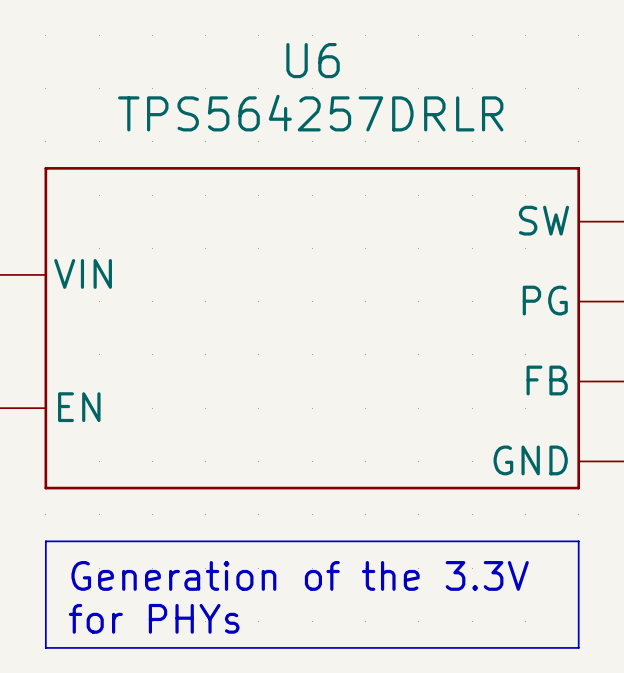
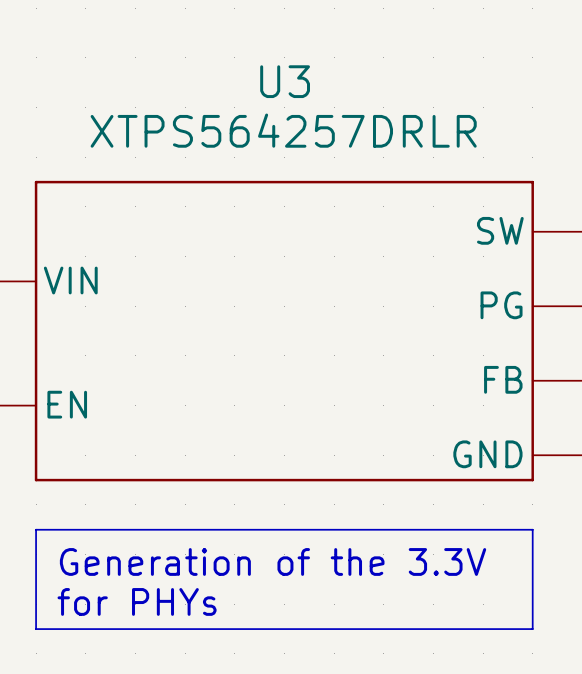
U6 name: U6 (313, 60) -> U3 (285, 81)
U6 value: TPS564257DRLR (310, 113) -> XTPS564257DRLR (283, 130)

